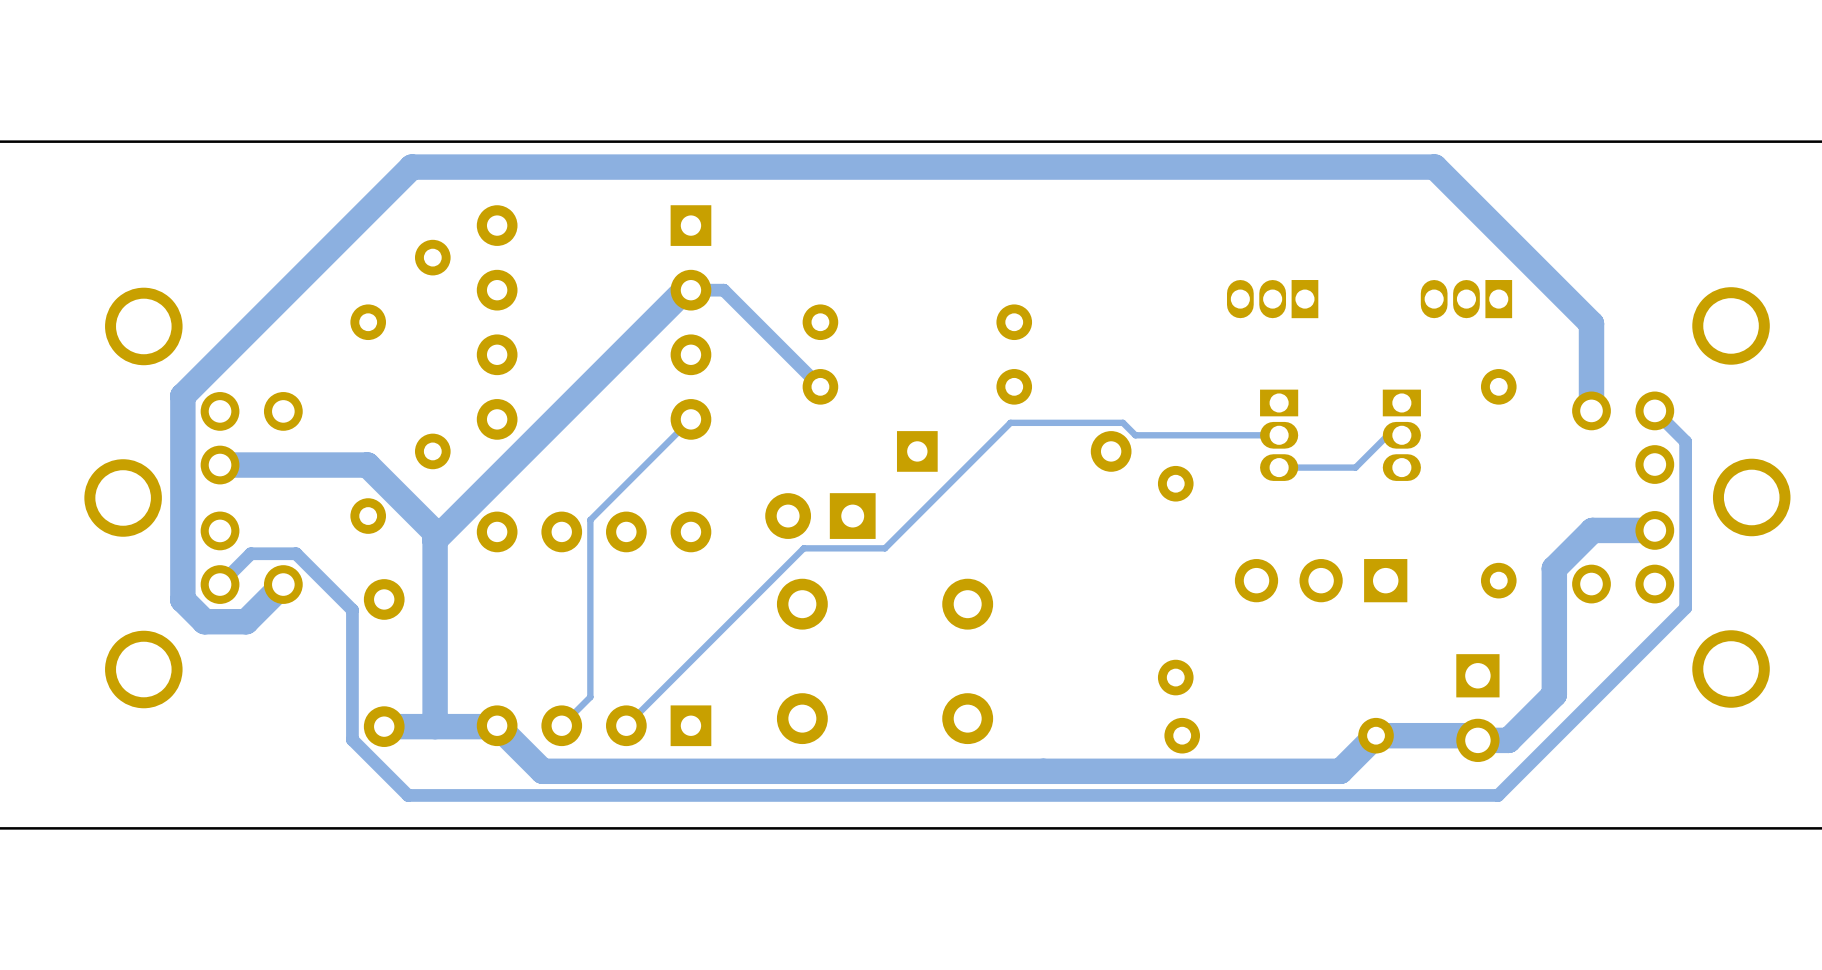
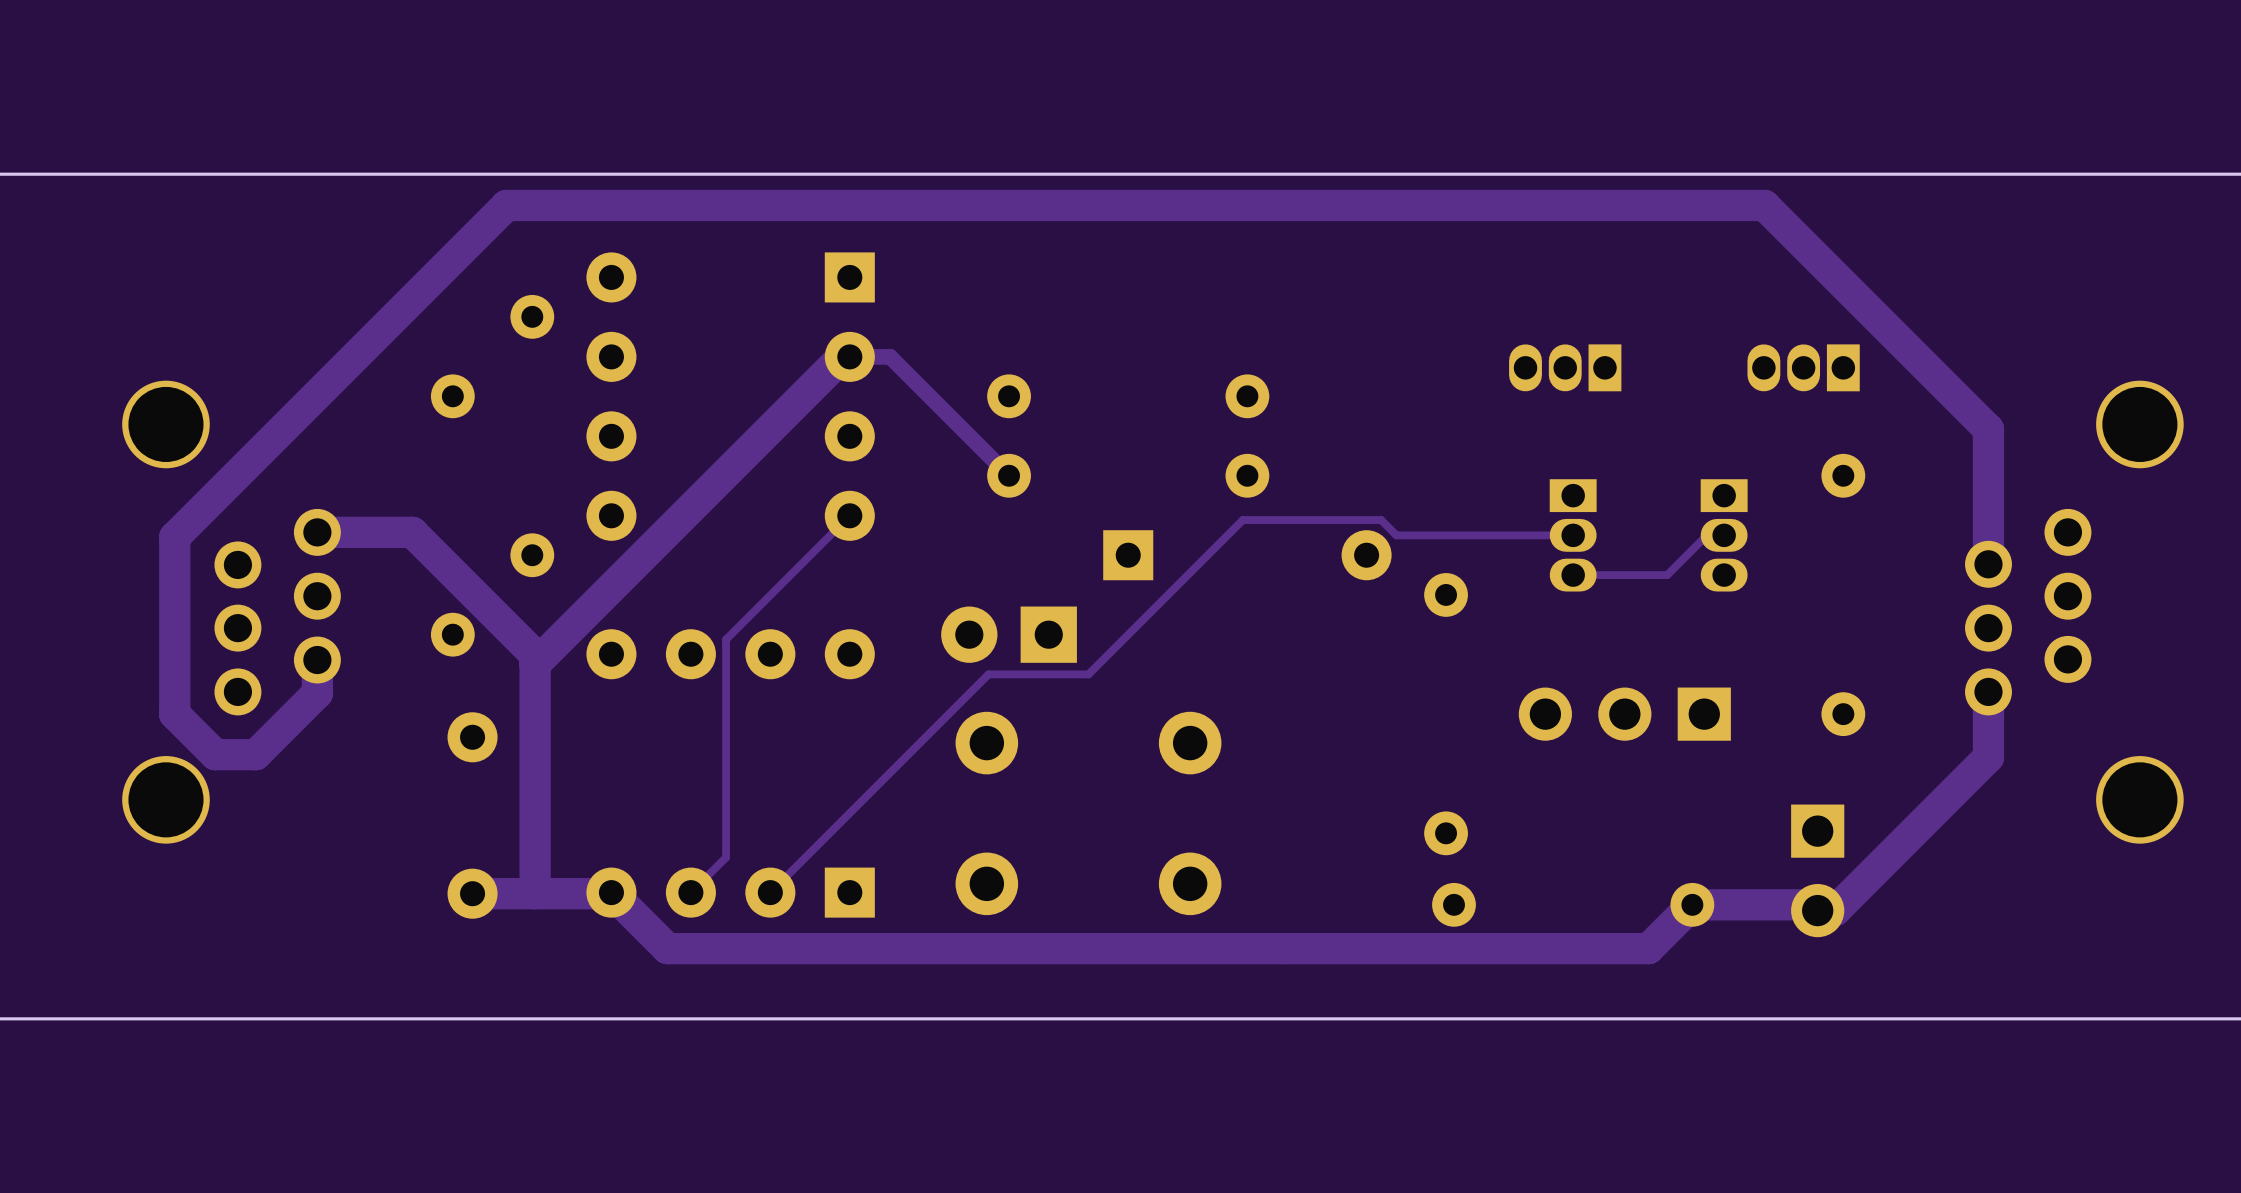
part footprint: [84, 287, 303, 709] -> [122, 380, 341, 844]
part footprint: [1572, 287, 1791, 708] -> [1965, 380, 2184, 844]
track: (1591, 323) (1591, 410) -> (1957, 398) (1988, 429) (1988, 564)
track: (182, 396) (182, 599) (204, 621) (246, 621) (283, 584) -> (224, 487) (174, 537) (174, 714) (215, 754) (255, 754) (317, 693) (317, 660)
track: (1654, 410) (1685, 441) (1685, 607) (1498, 795) (408, 795) (352, 739) (352, 610) (296, 553) (250, 553) (220, 584) -> none
track: (367, 465) (220, 465) -> (452, 571) (412, 532) (317, 532)
track: (1654, 530) (1592, 530) (1554, 568) (1554, 694) (1508, 740) (1492, 740) -> (1988, 691) (1988, 757) (1835, 910)

